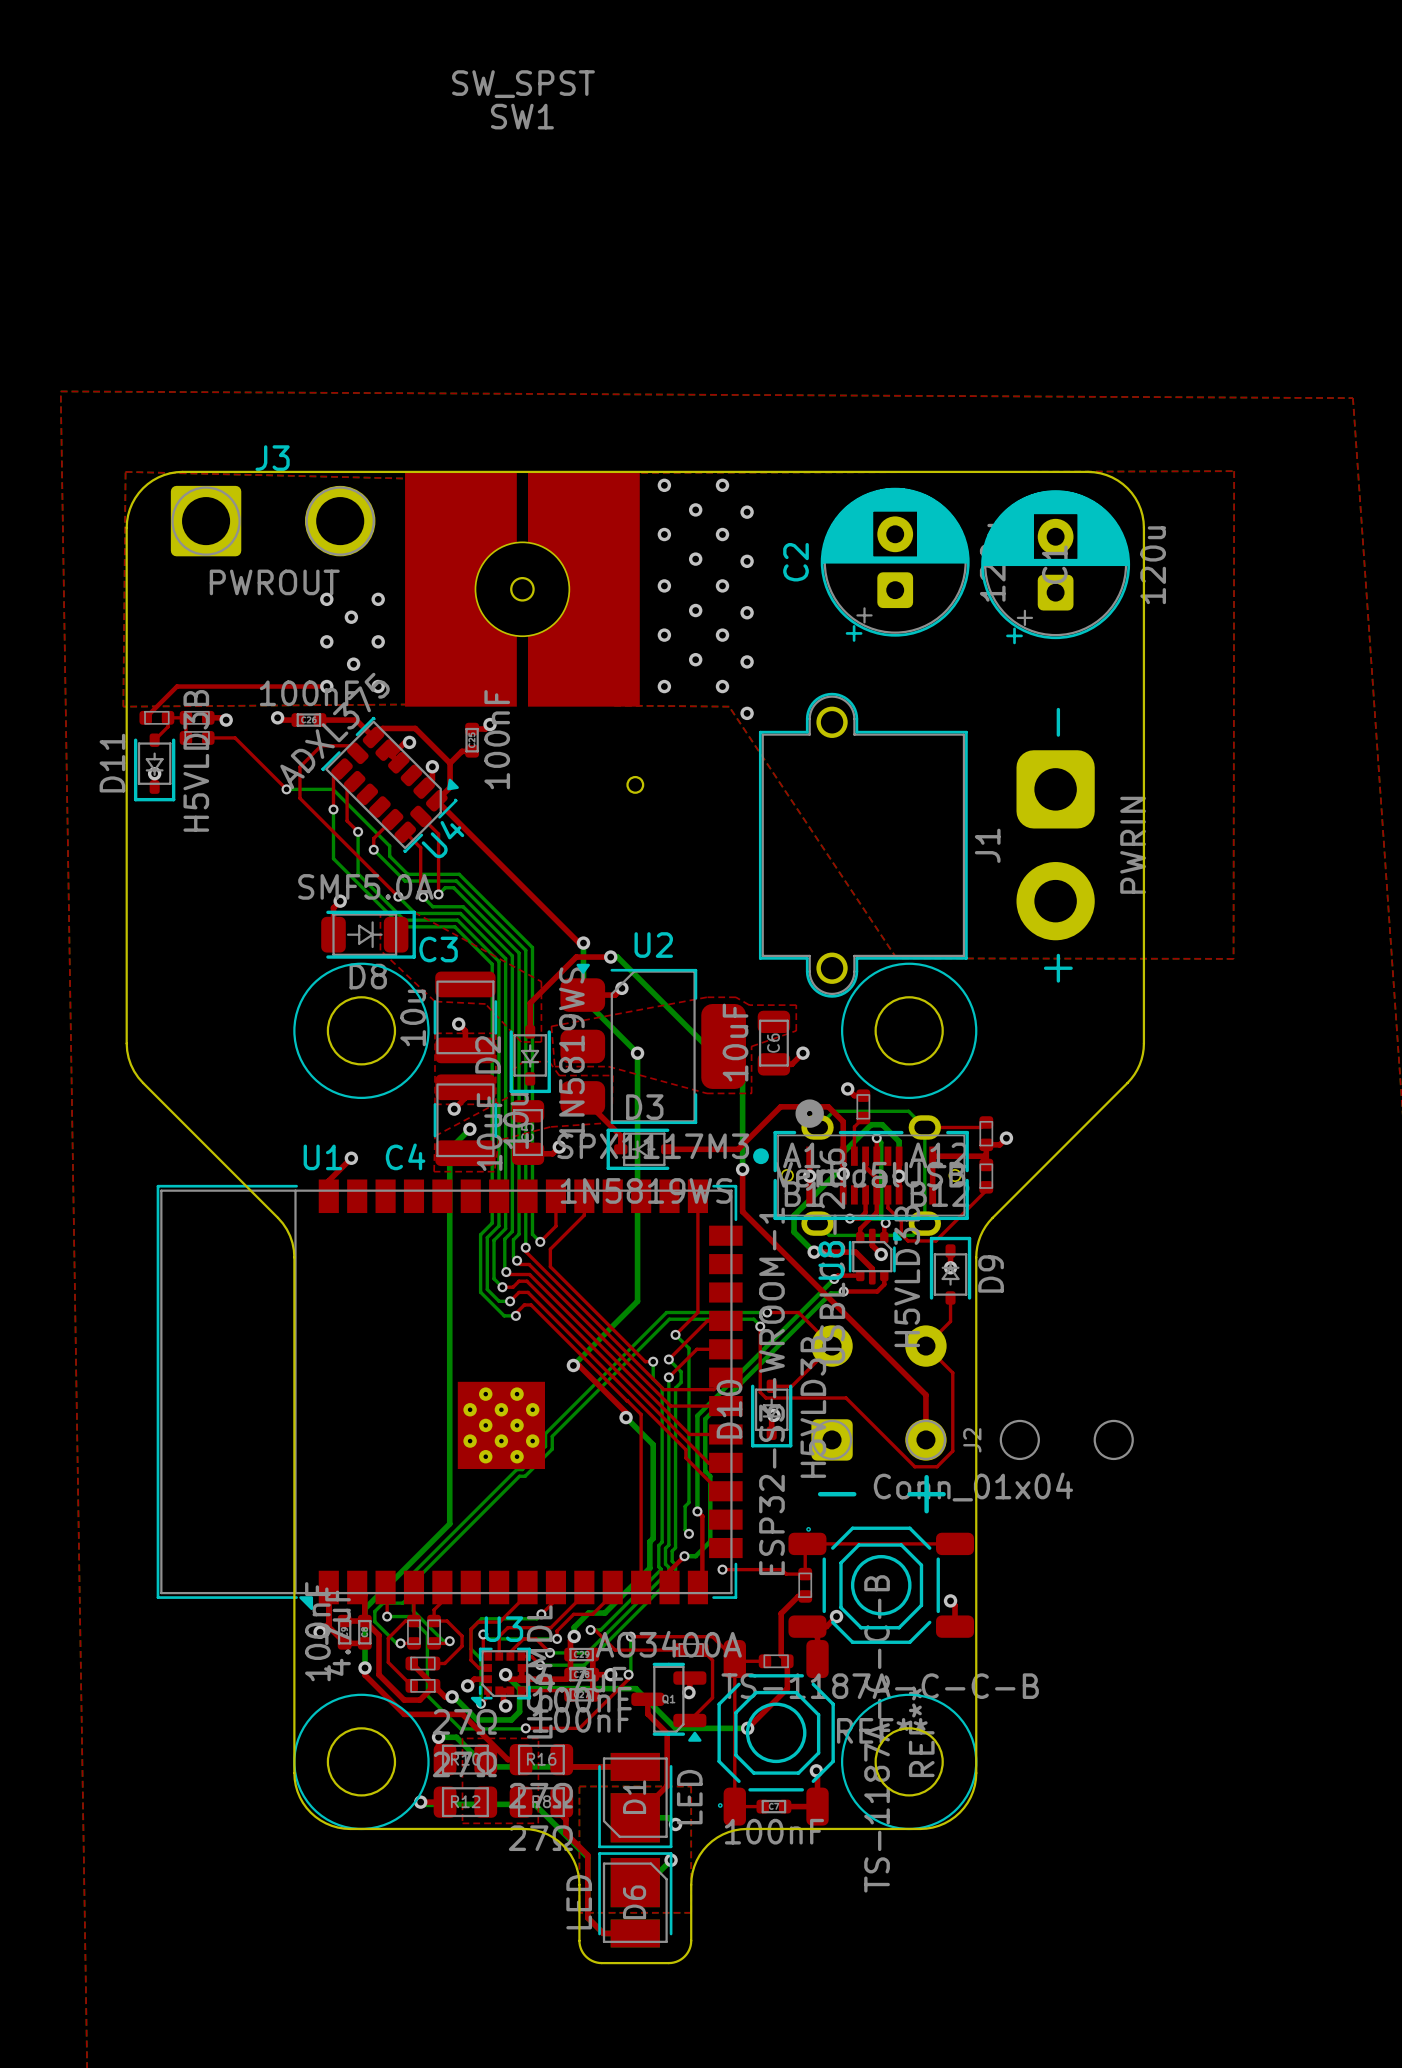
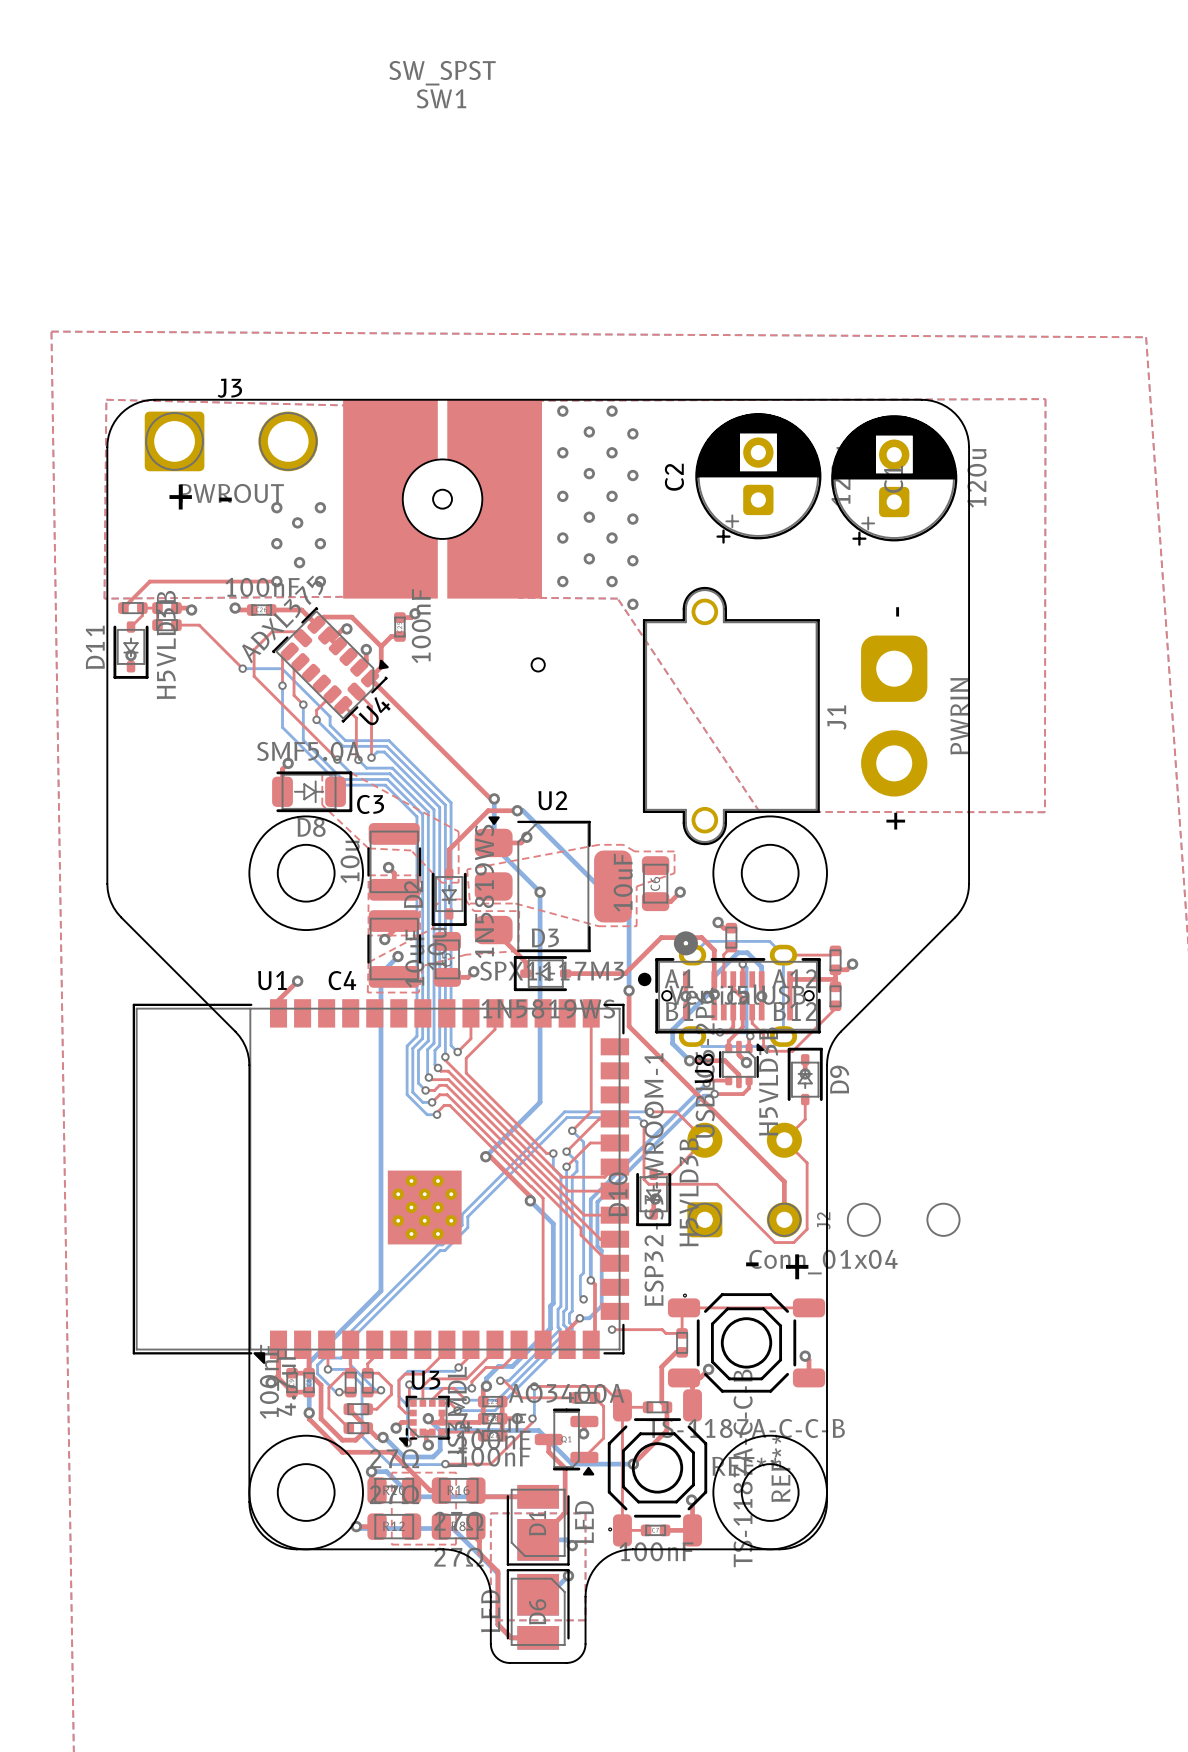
text: none -> + - (200, 497)

